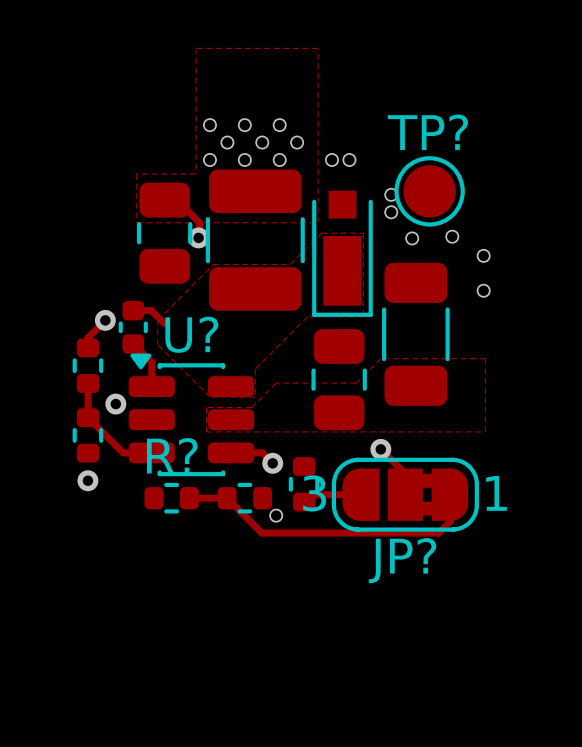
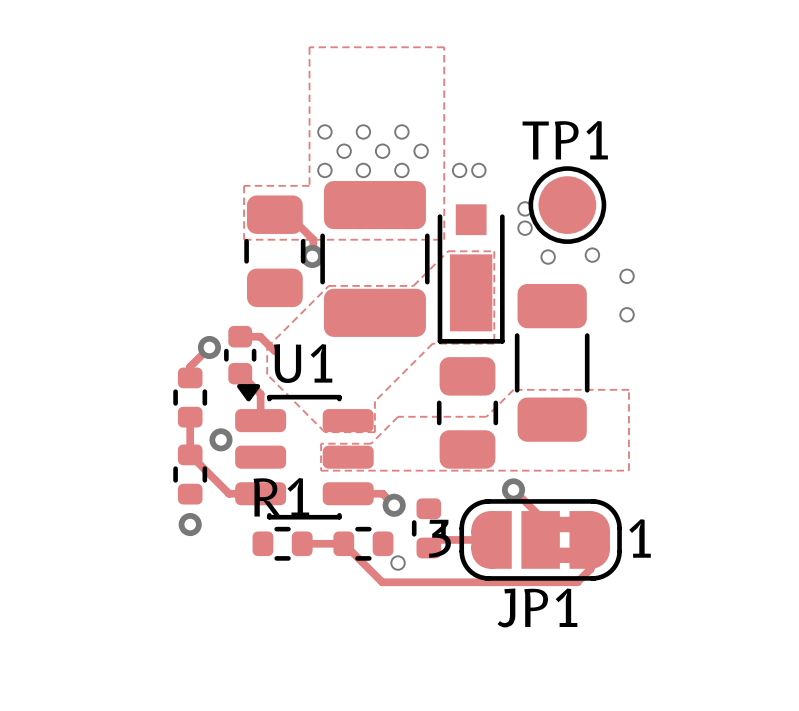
TP? name: TP? (427, 132) -> TP1 (565, 140)
U? name: U? (191, 334) -> U1 (303, 363)
R? name: R? (172, 455) -> R1 (281, 497)
JP? name: JP? (402, 560) -> JP1 (537, 607)

